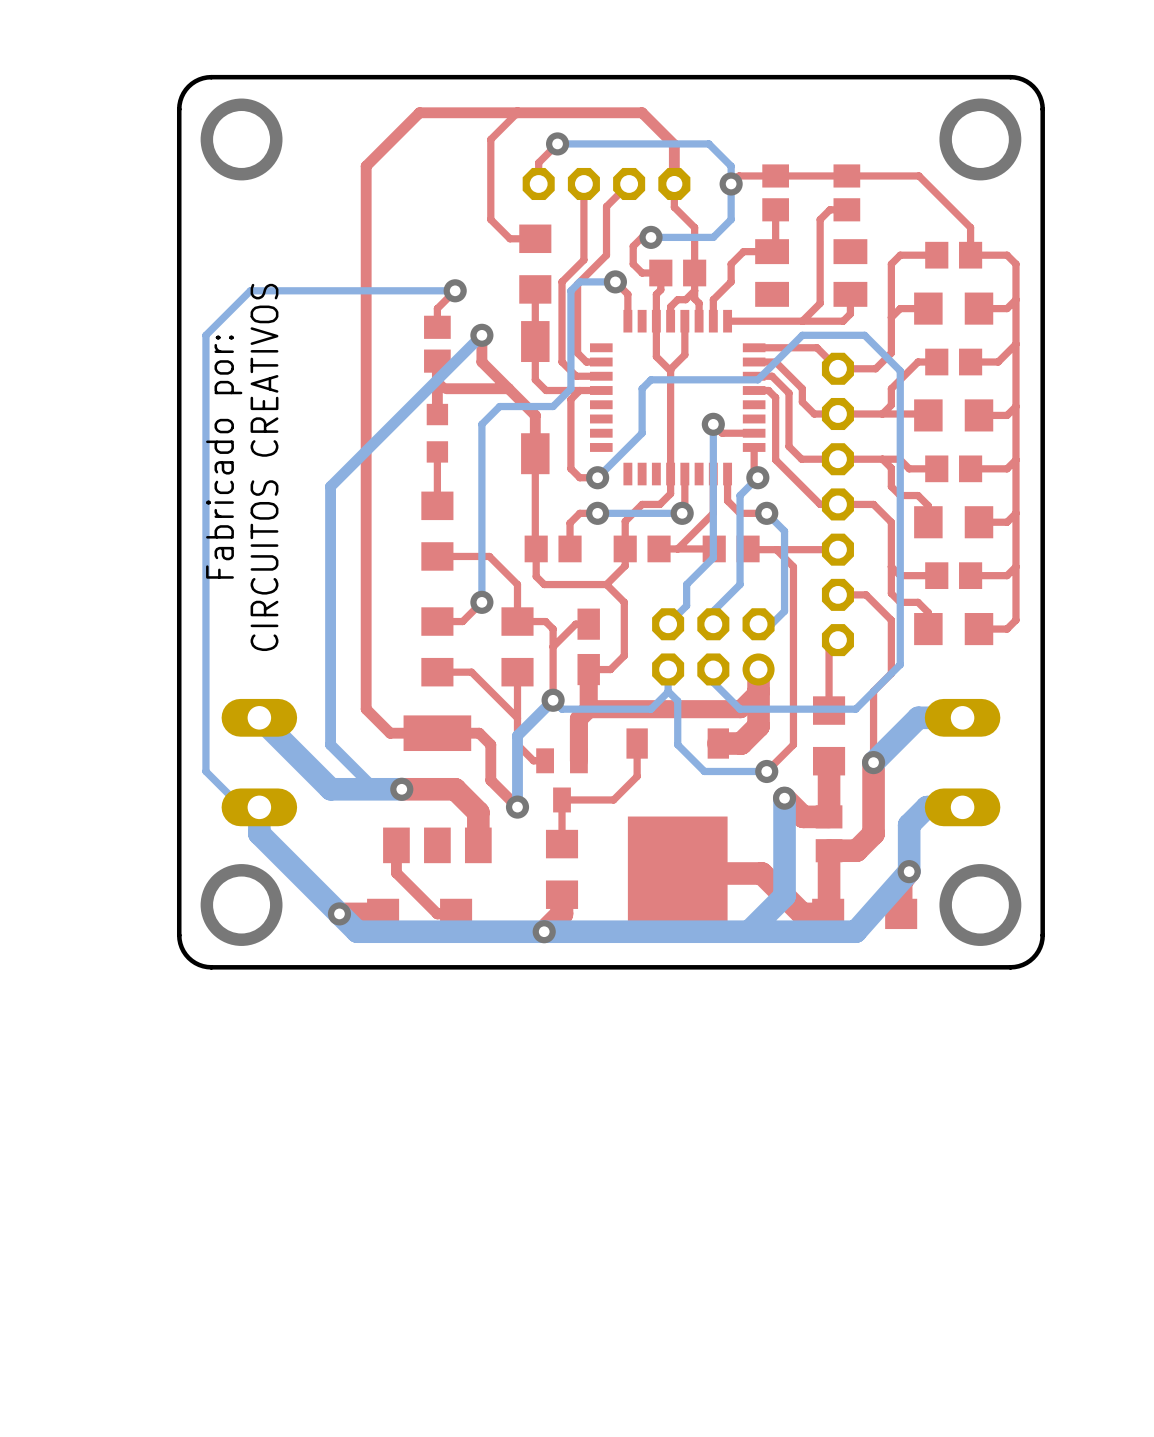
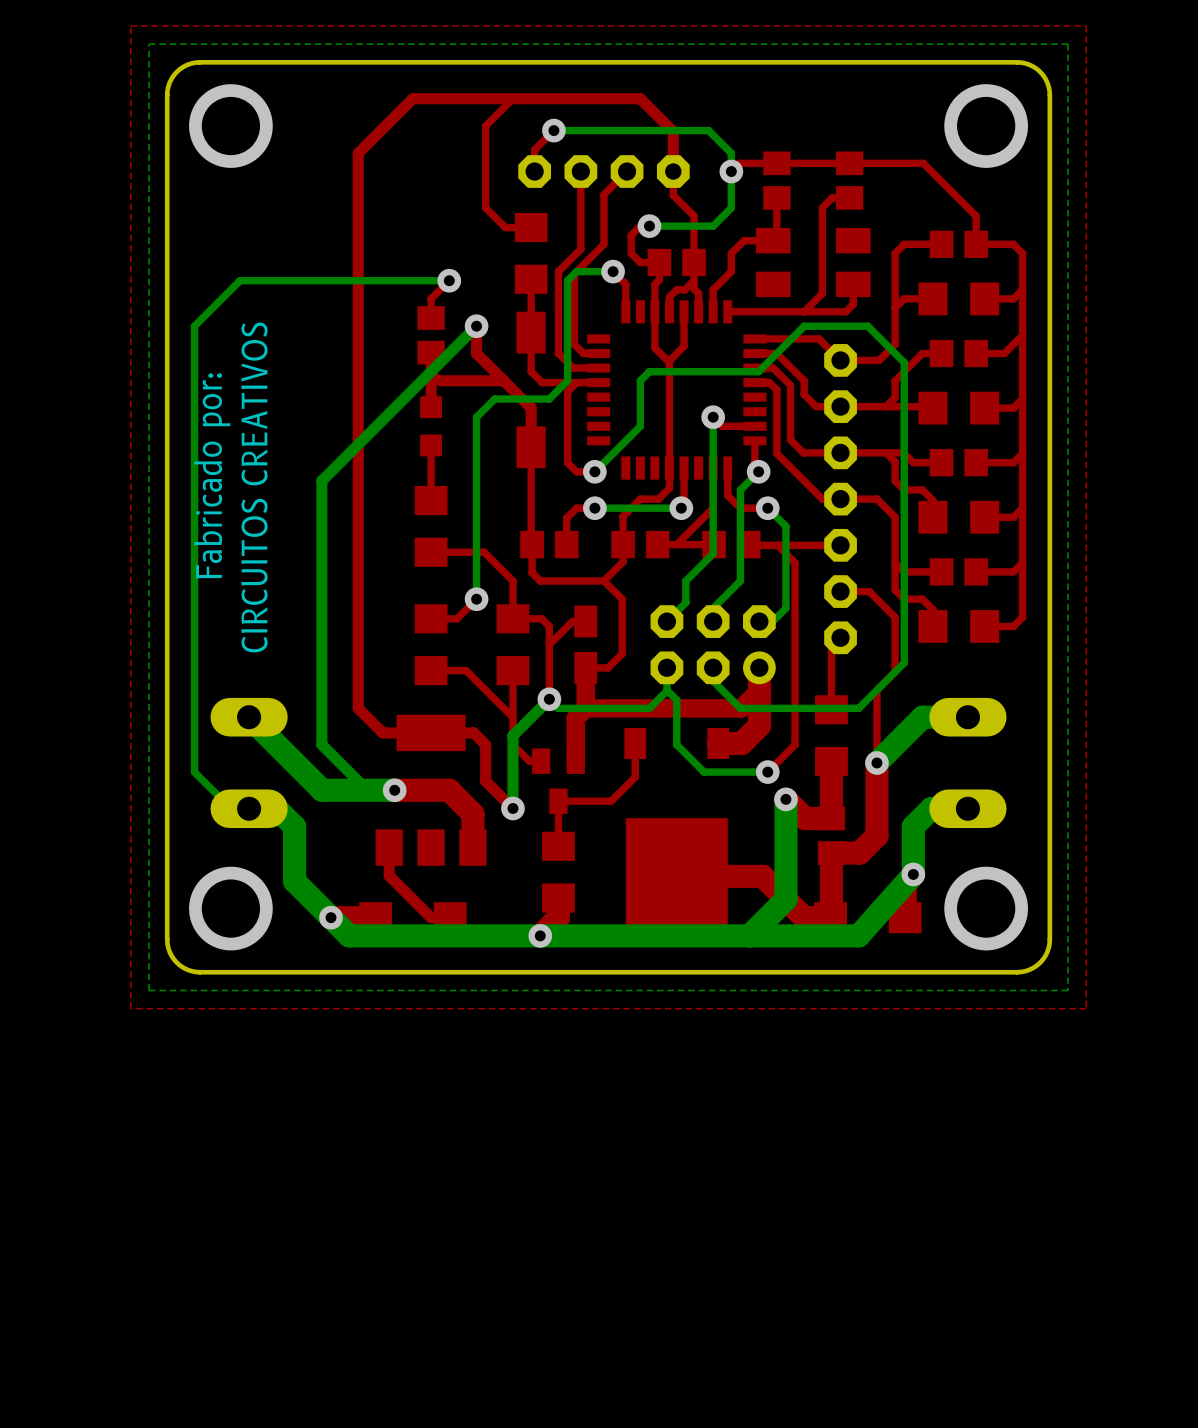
top zone outline: none -> (1086, 25) (130, 25) (130, 1008) (1086, 1008) (1086, 25)
bottom zone outline: none -> (1068, 44) (149, 44) (149, 990) (1068, 990) (1068, 44)
bottom track: (259, 807) (259, 833) (303, 878) -> (249, 808) (276, 808) (294, 826) (294, 881)

